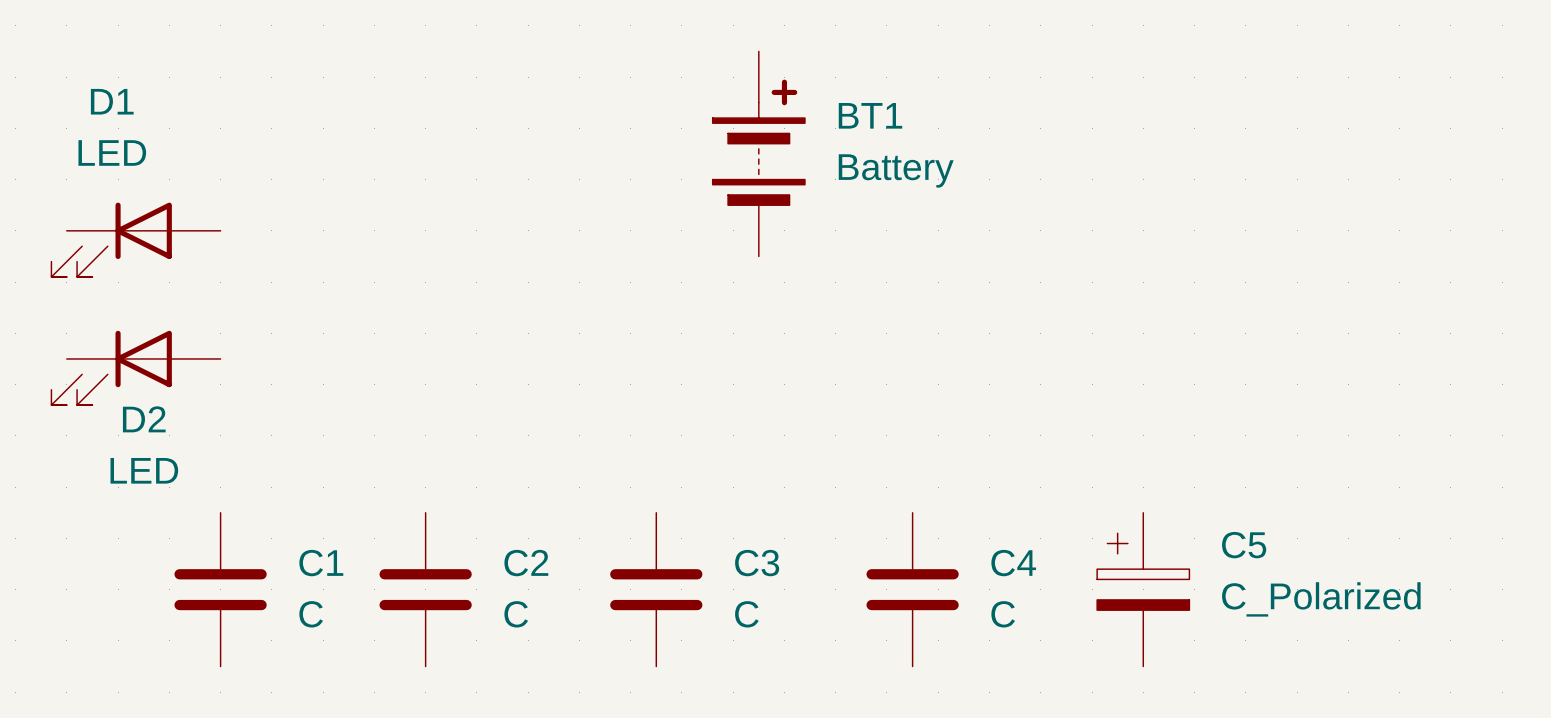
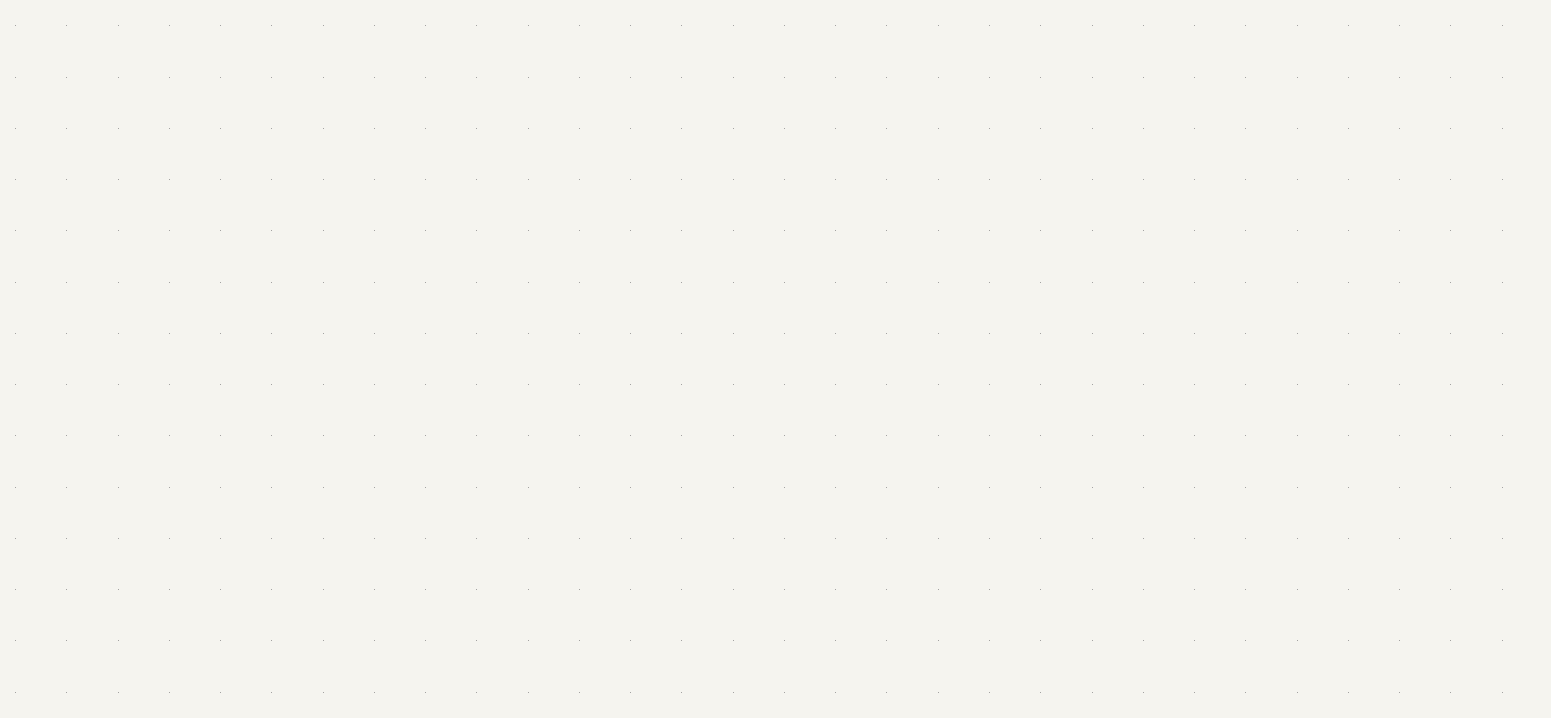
BT1: Battery (758, 153) -> none
D1: LED (136, 239) -> none
D2: LED (136, 367) -> none
C1: C (220, 589) -> none
C2: C (425, 589) -> none
C3: C (656, 589) -> none
C4: C (912, 589) -> none
C5: C_Polarized (1143, 589) -> none

